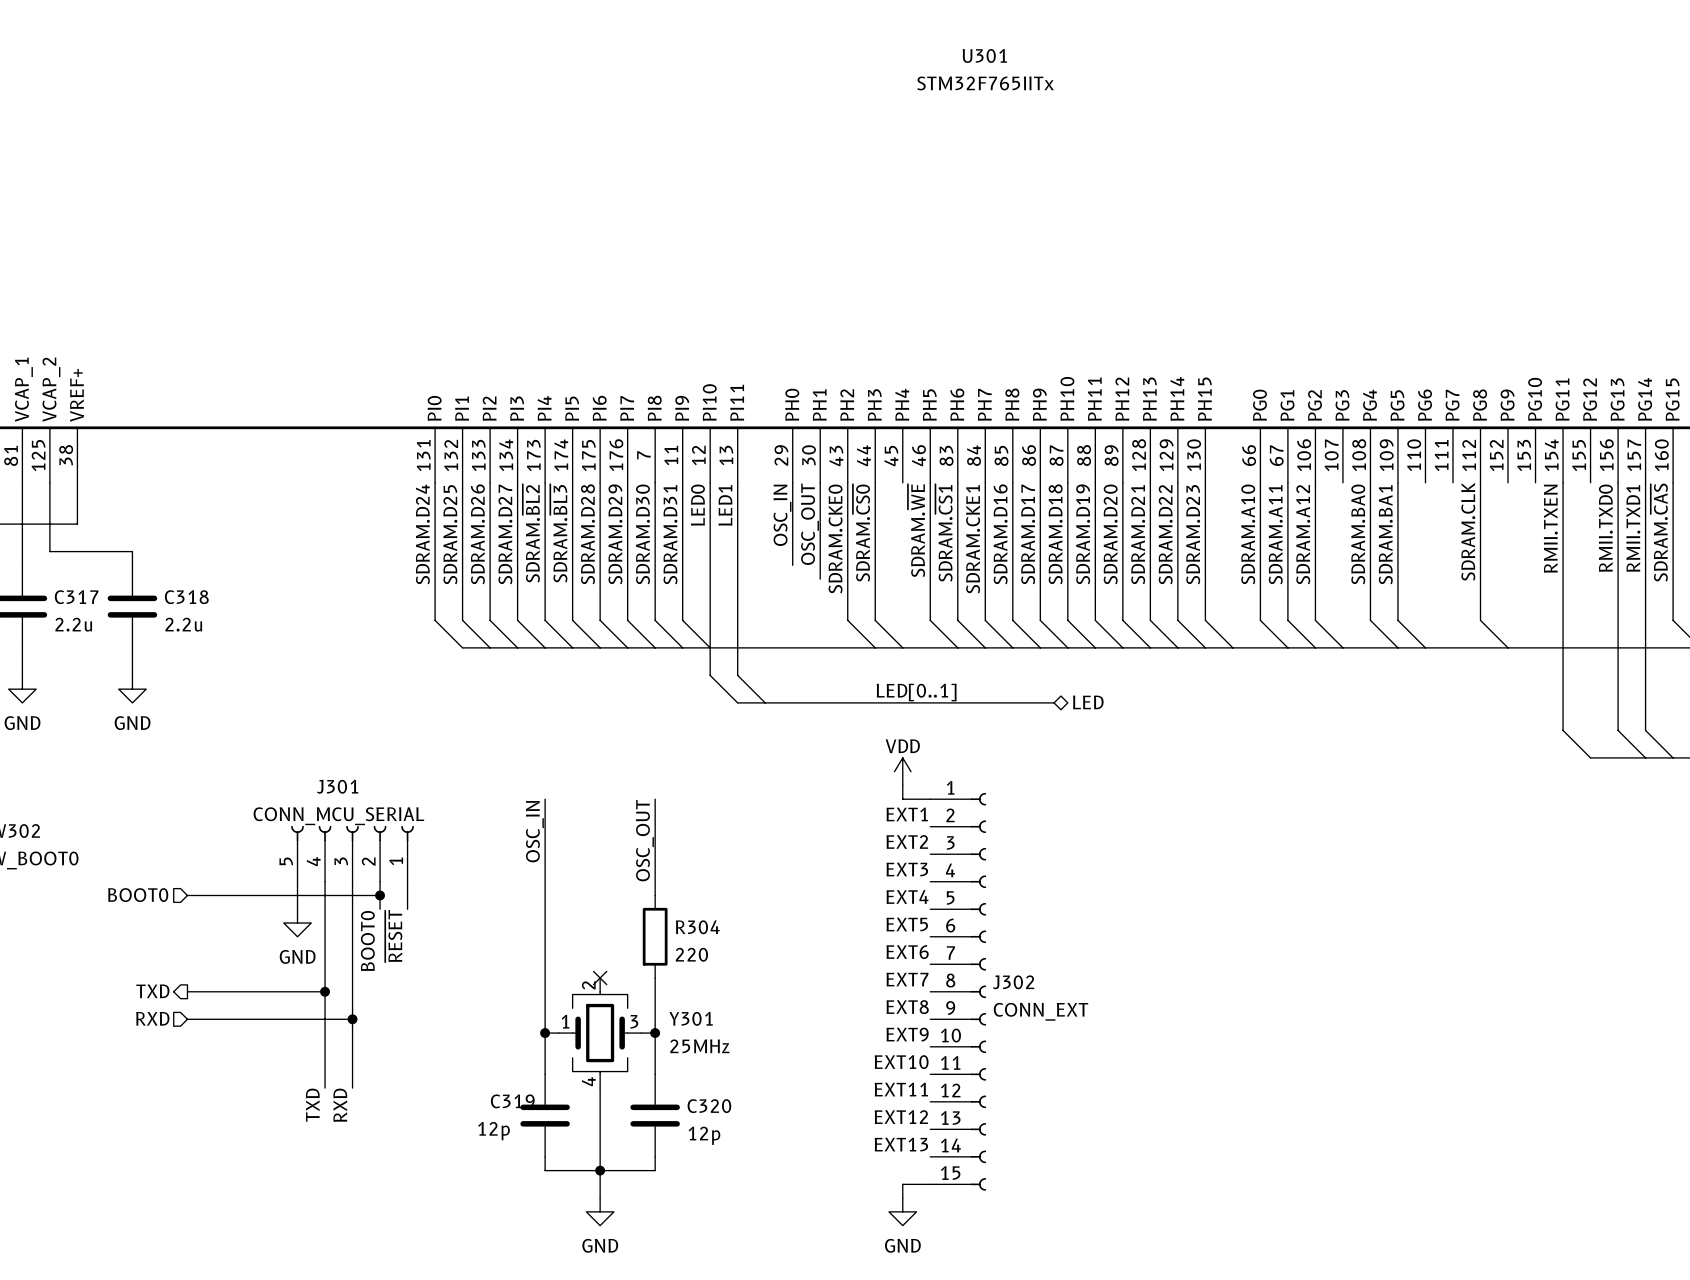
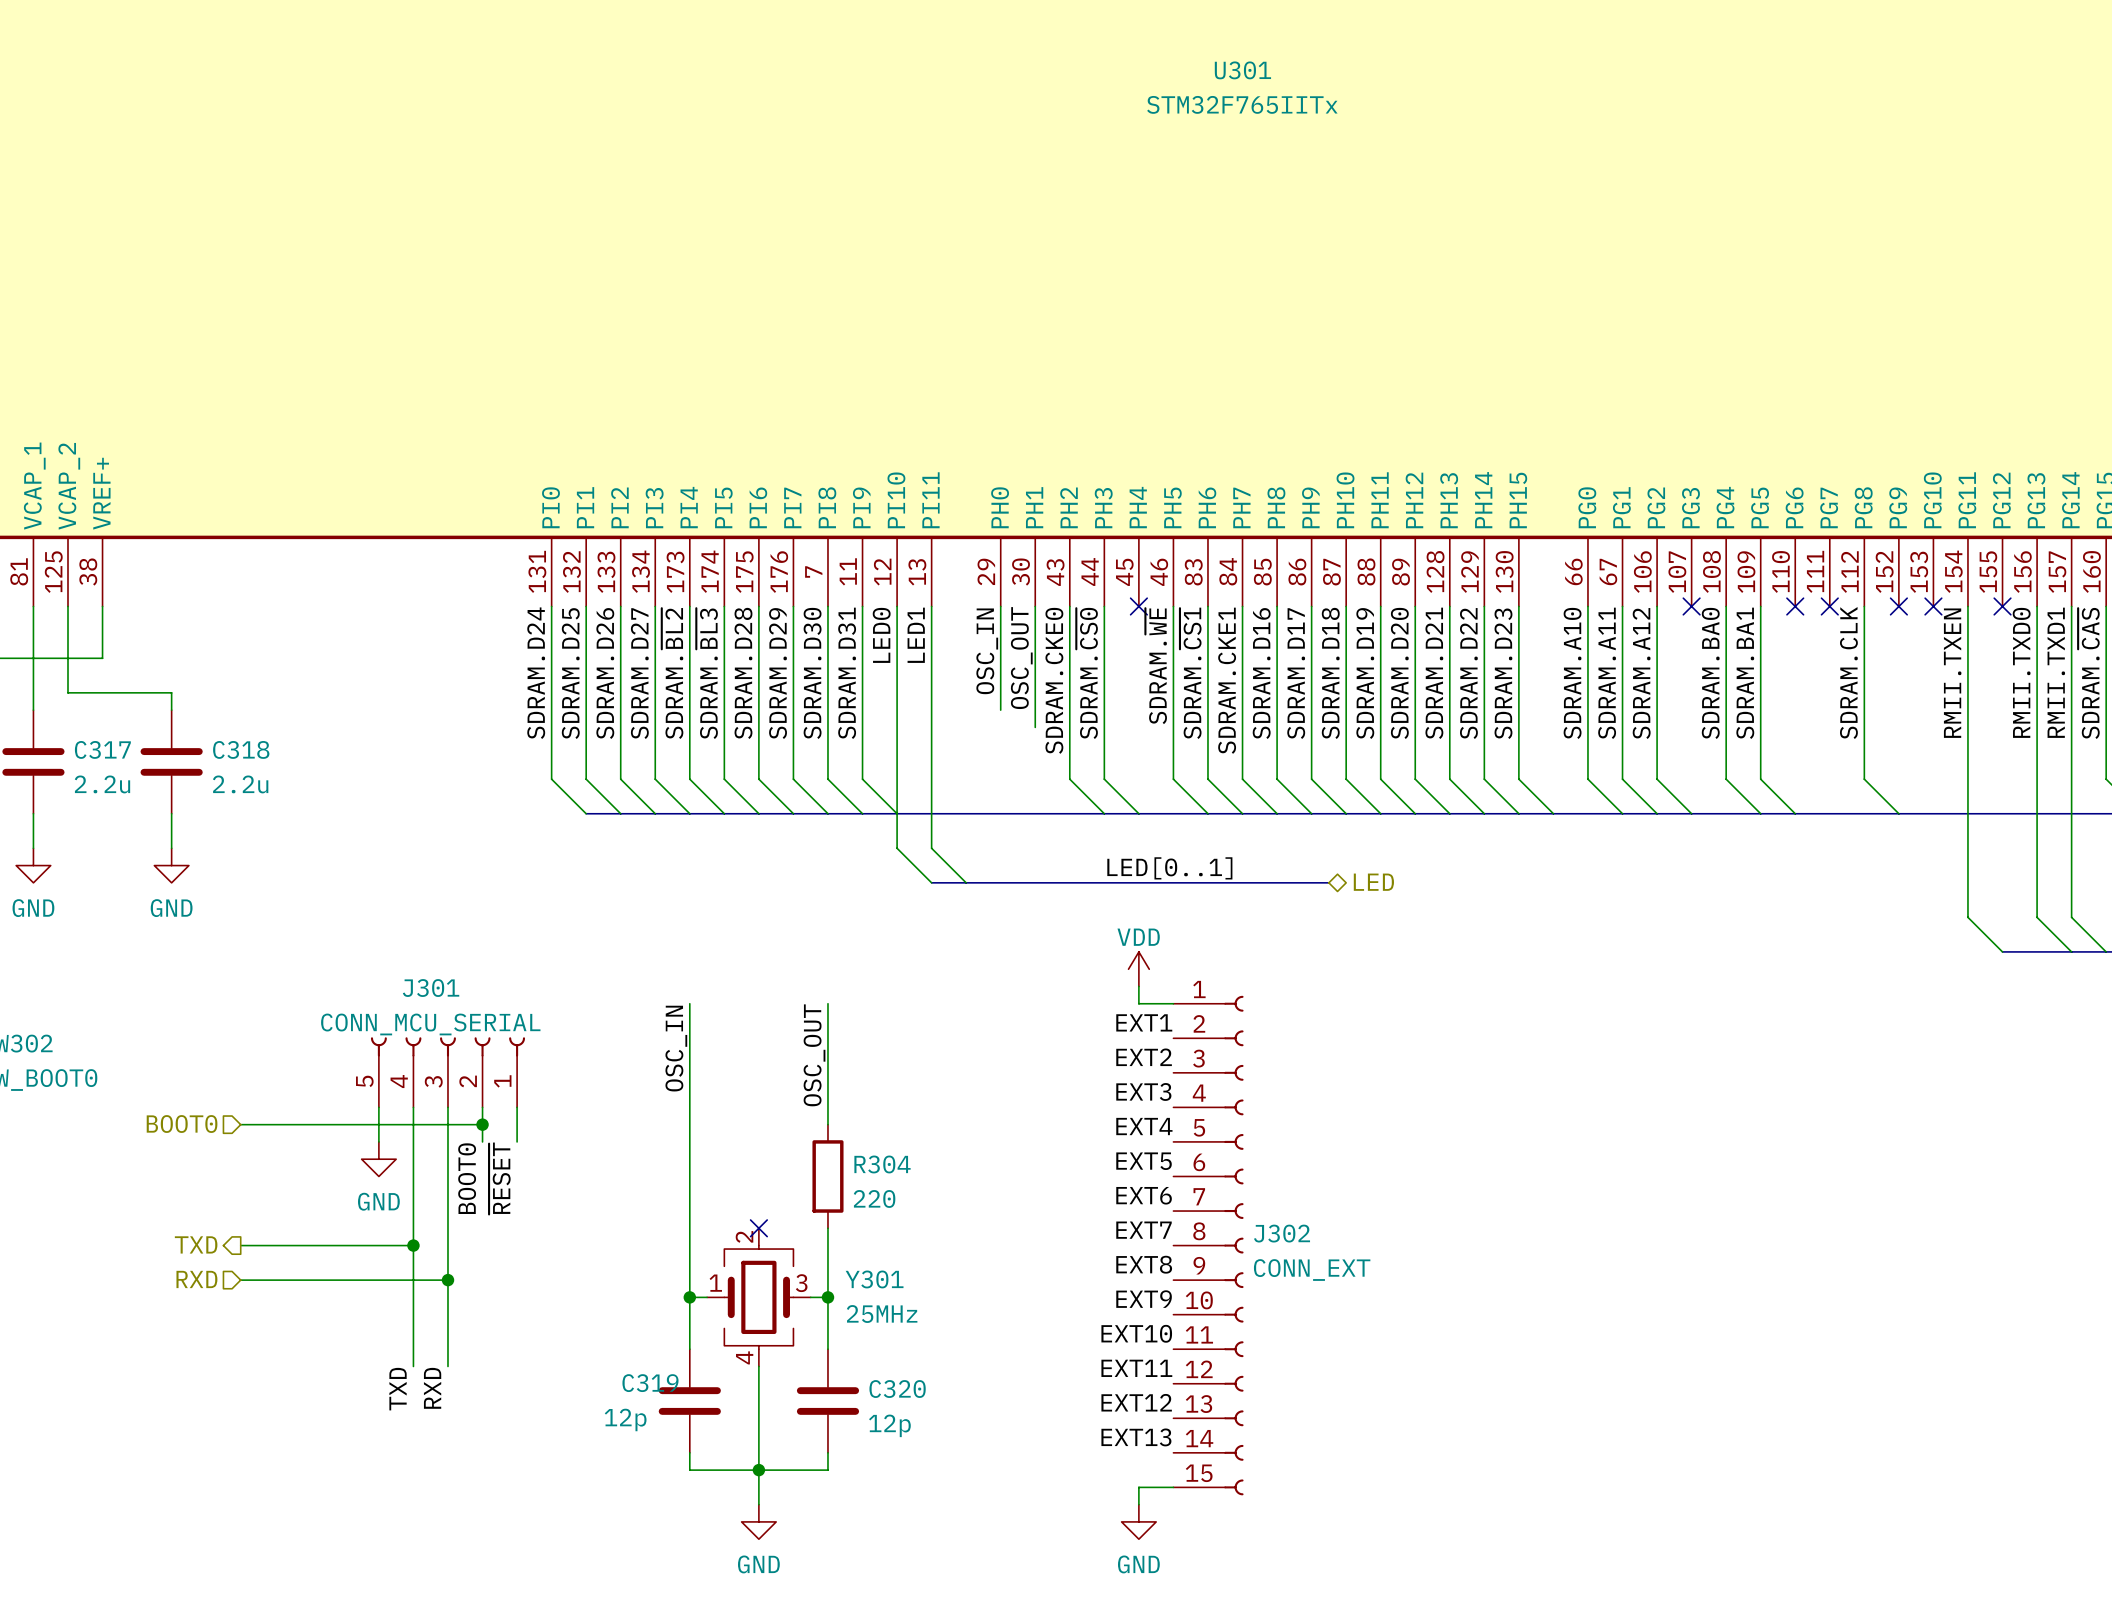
no-connect mark: none -> (1138, 606)
no-connect mark: none -> (1691, 606)
no-connect mark: none -> (1795, 606)
no-connect mark: none -> (1829, 606)
no-connect mark: none -> (1898, 606)
no-connect mark: none -> (1933, 606)
no-connect mark: none -> (2002, 606)

